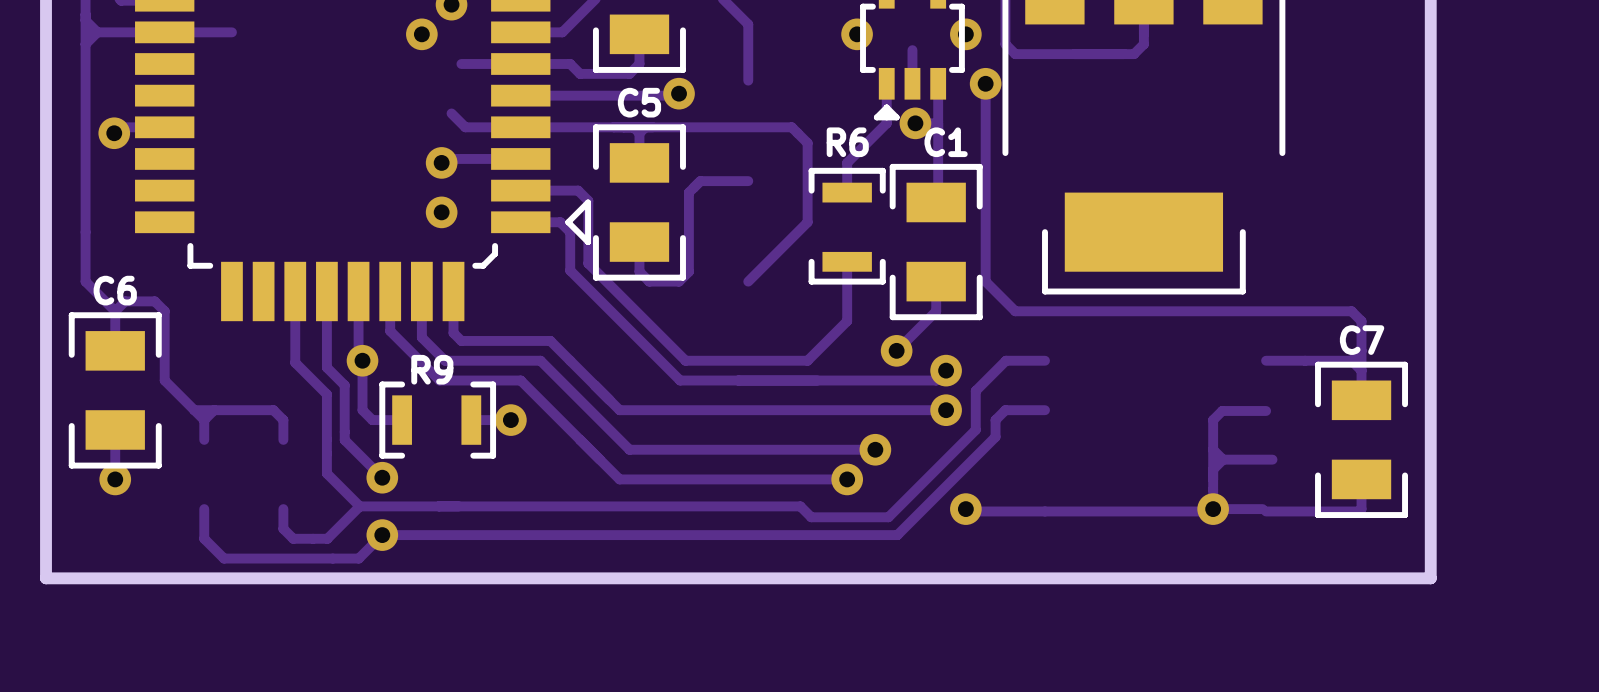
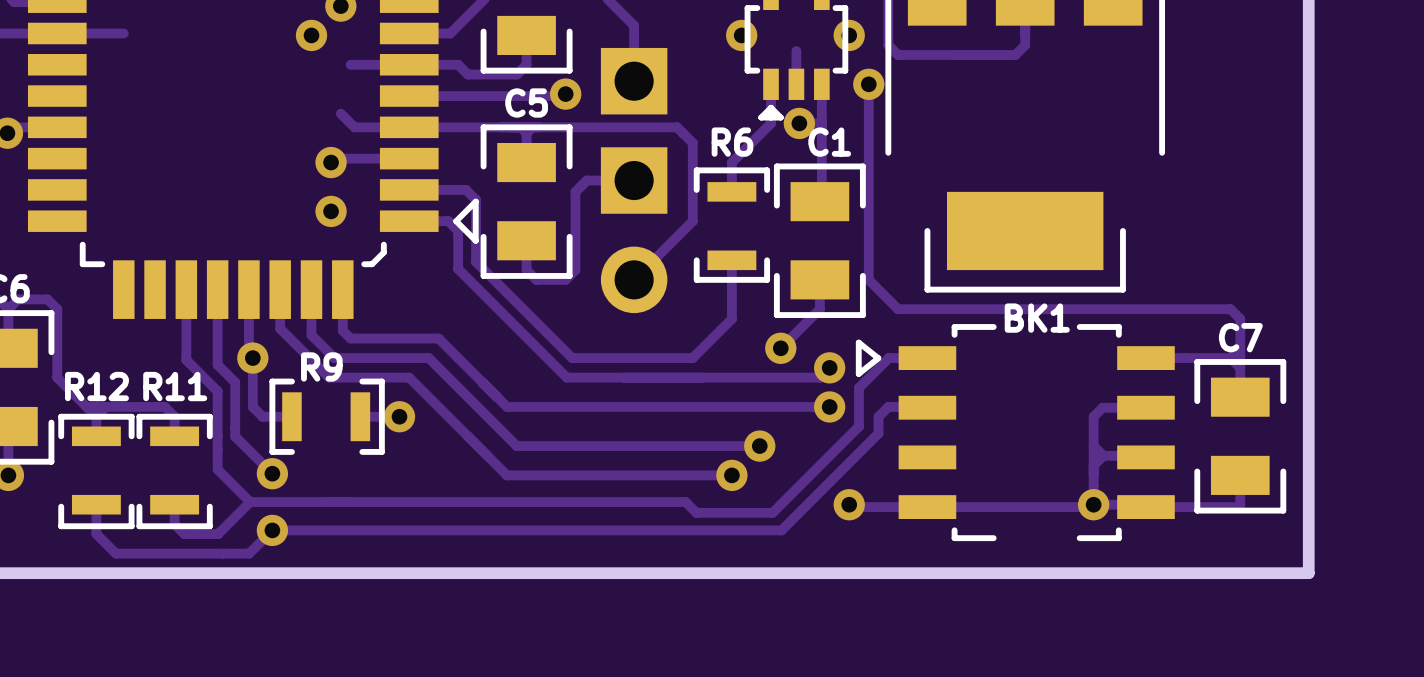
part: none -> (634, 180)
BK1: none -> (1015, 432)
R12: none -> (96, 471)
R11: none -> (174, 471)

